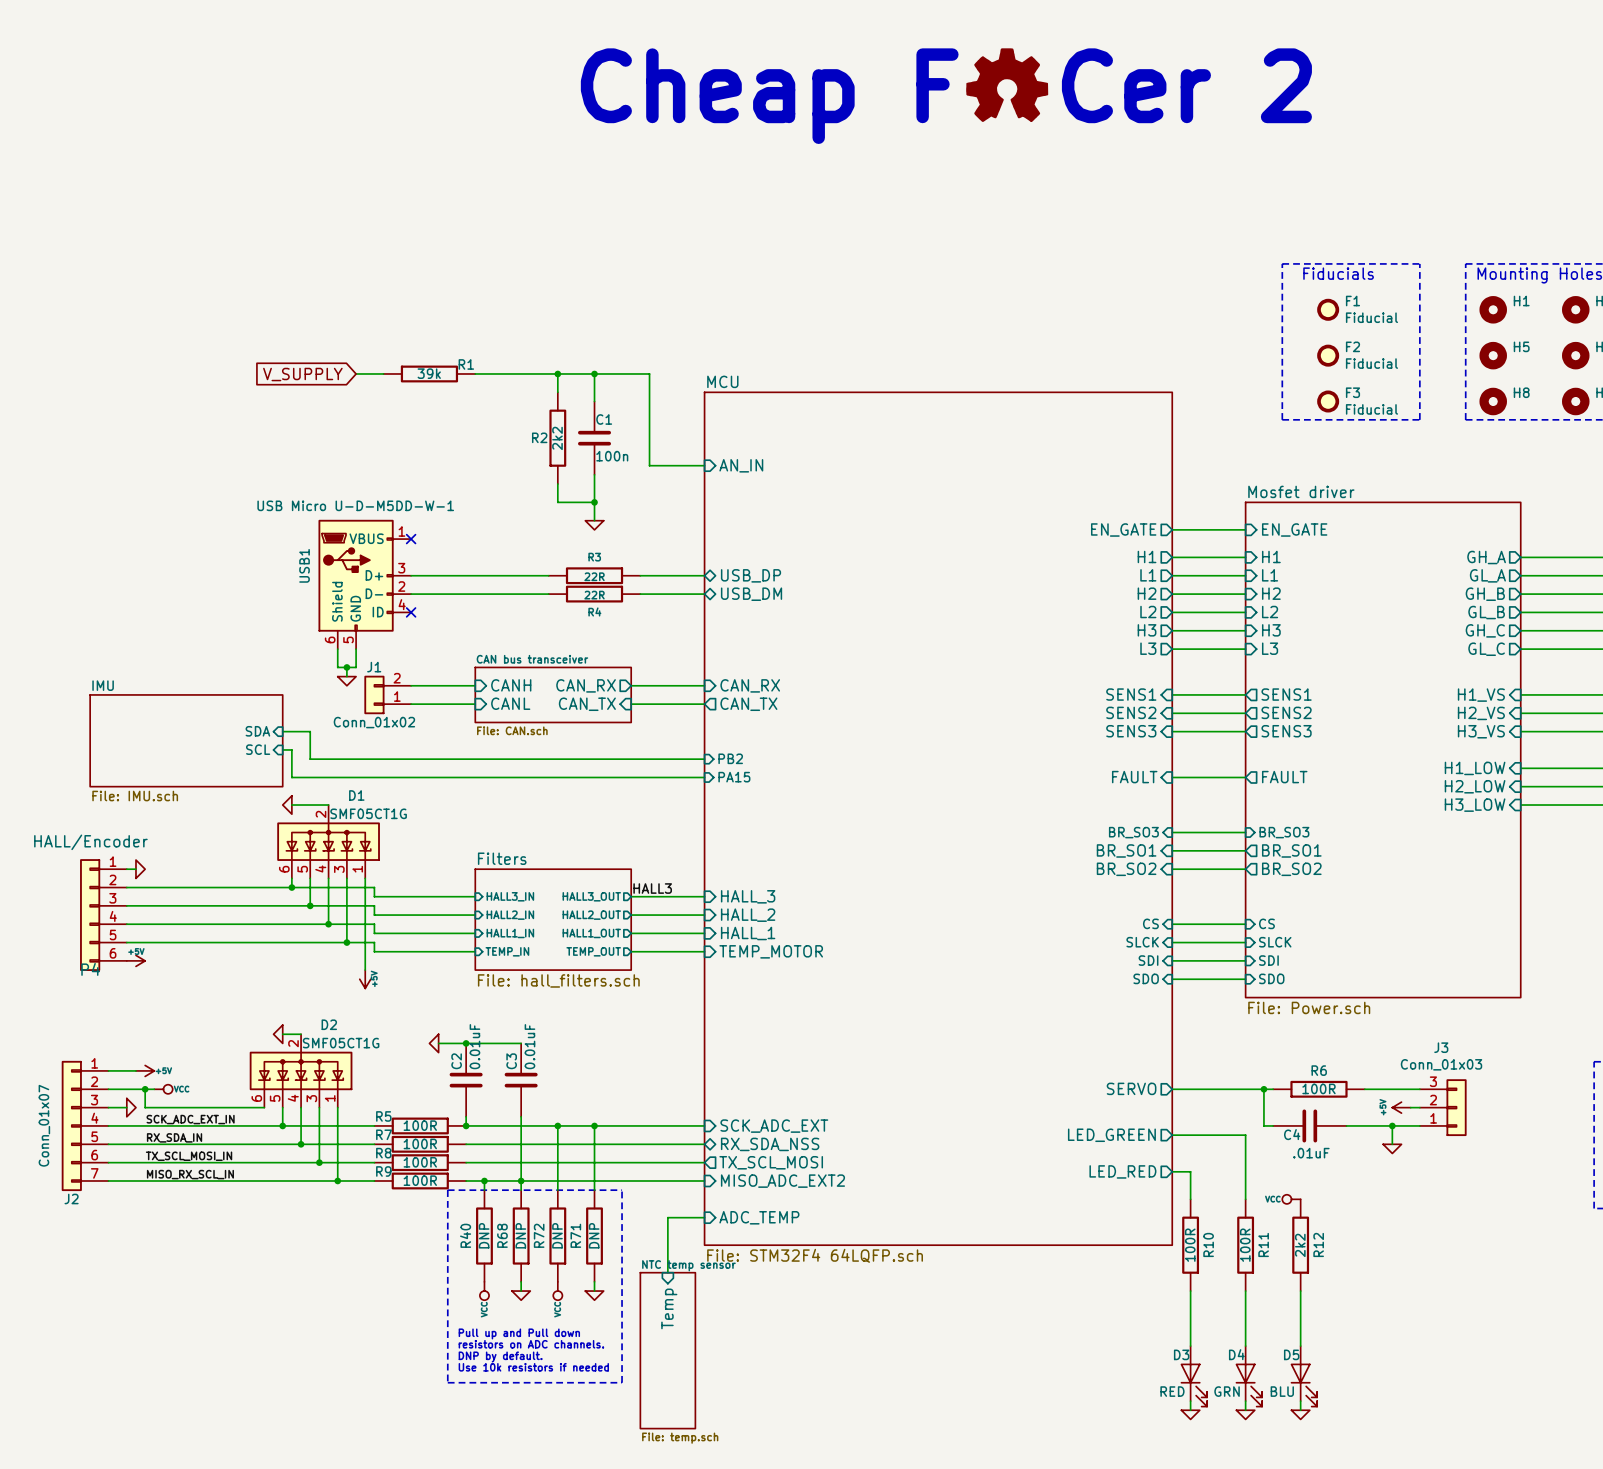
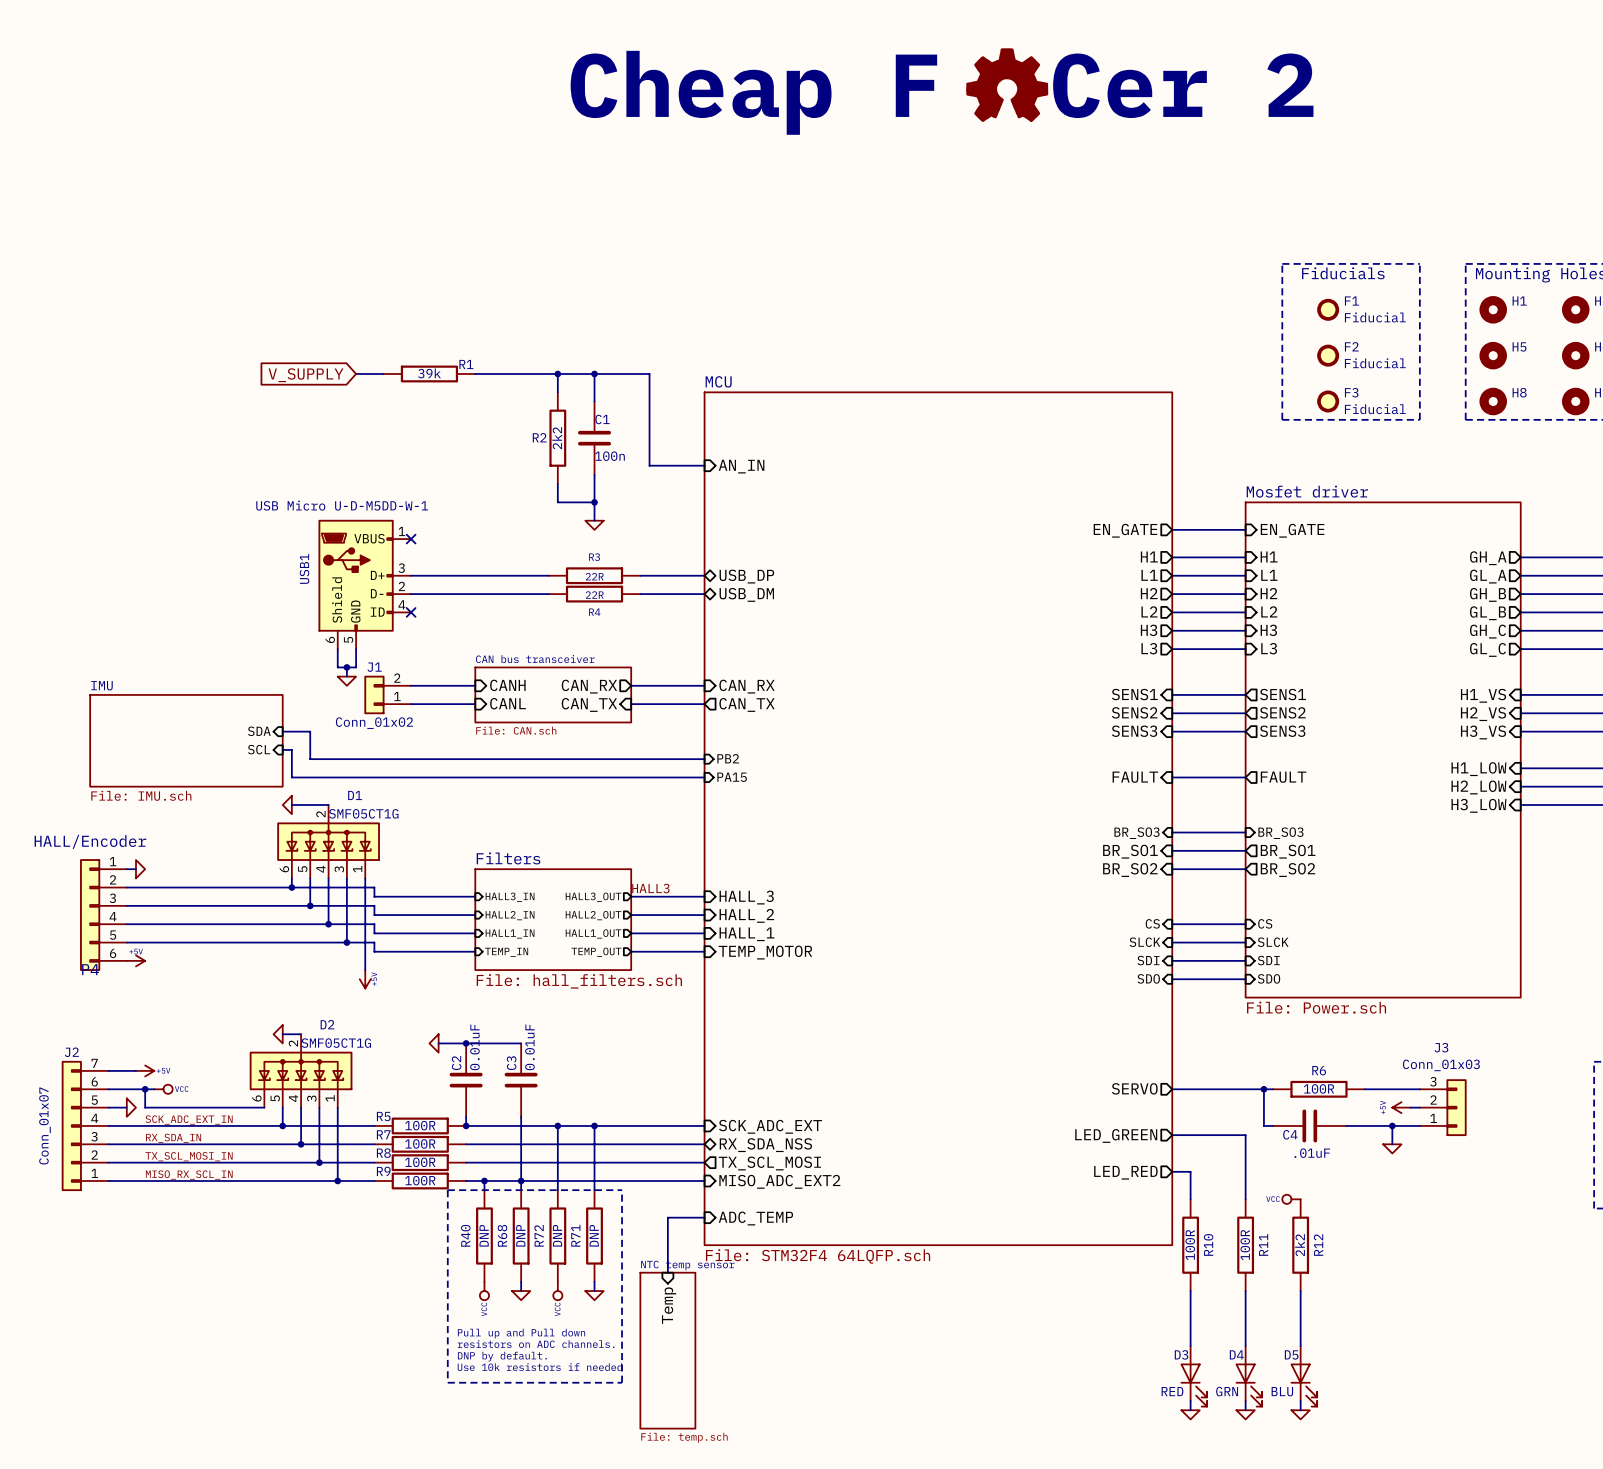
J2 flip: as is (71, 1125) -> up-down (71, 1125)

